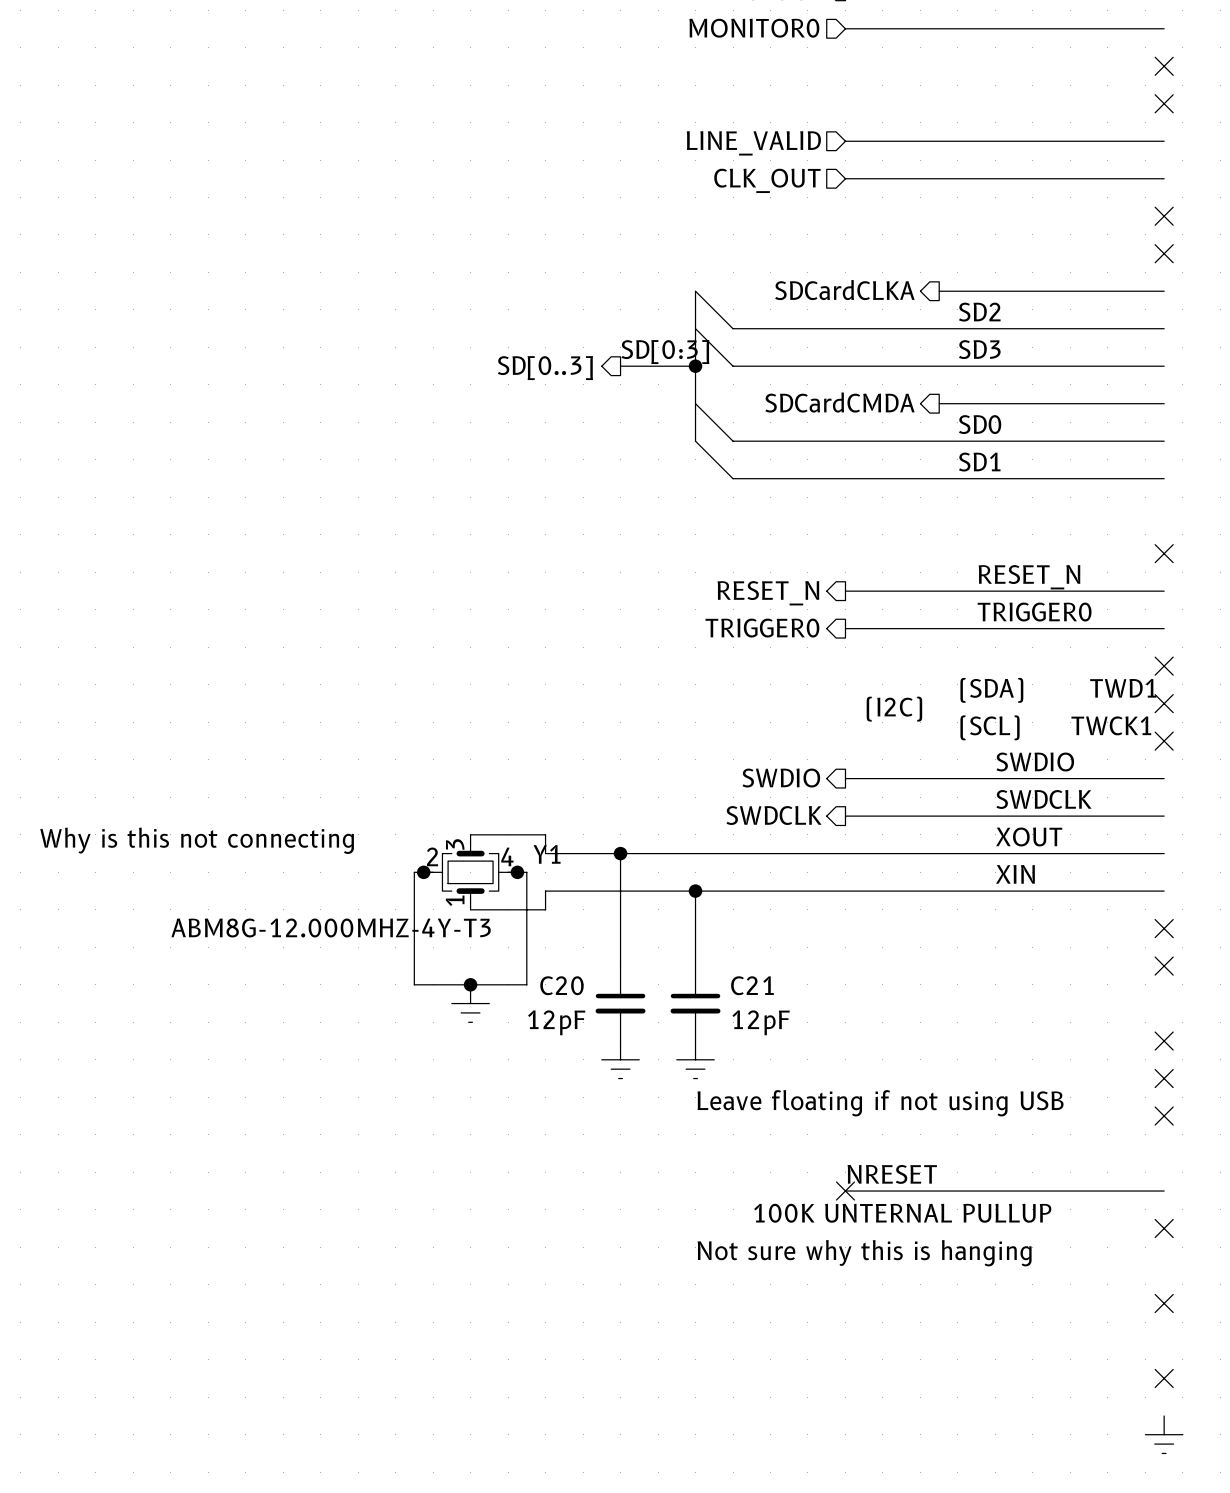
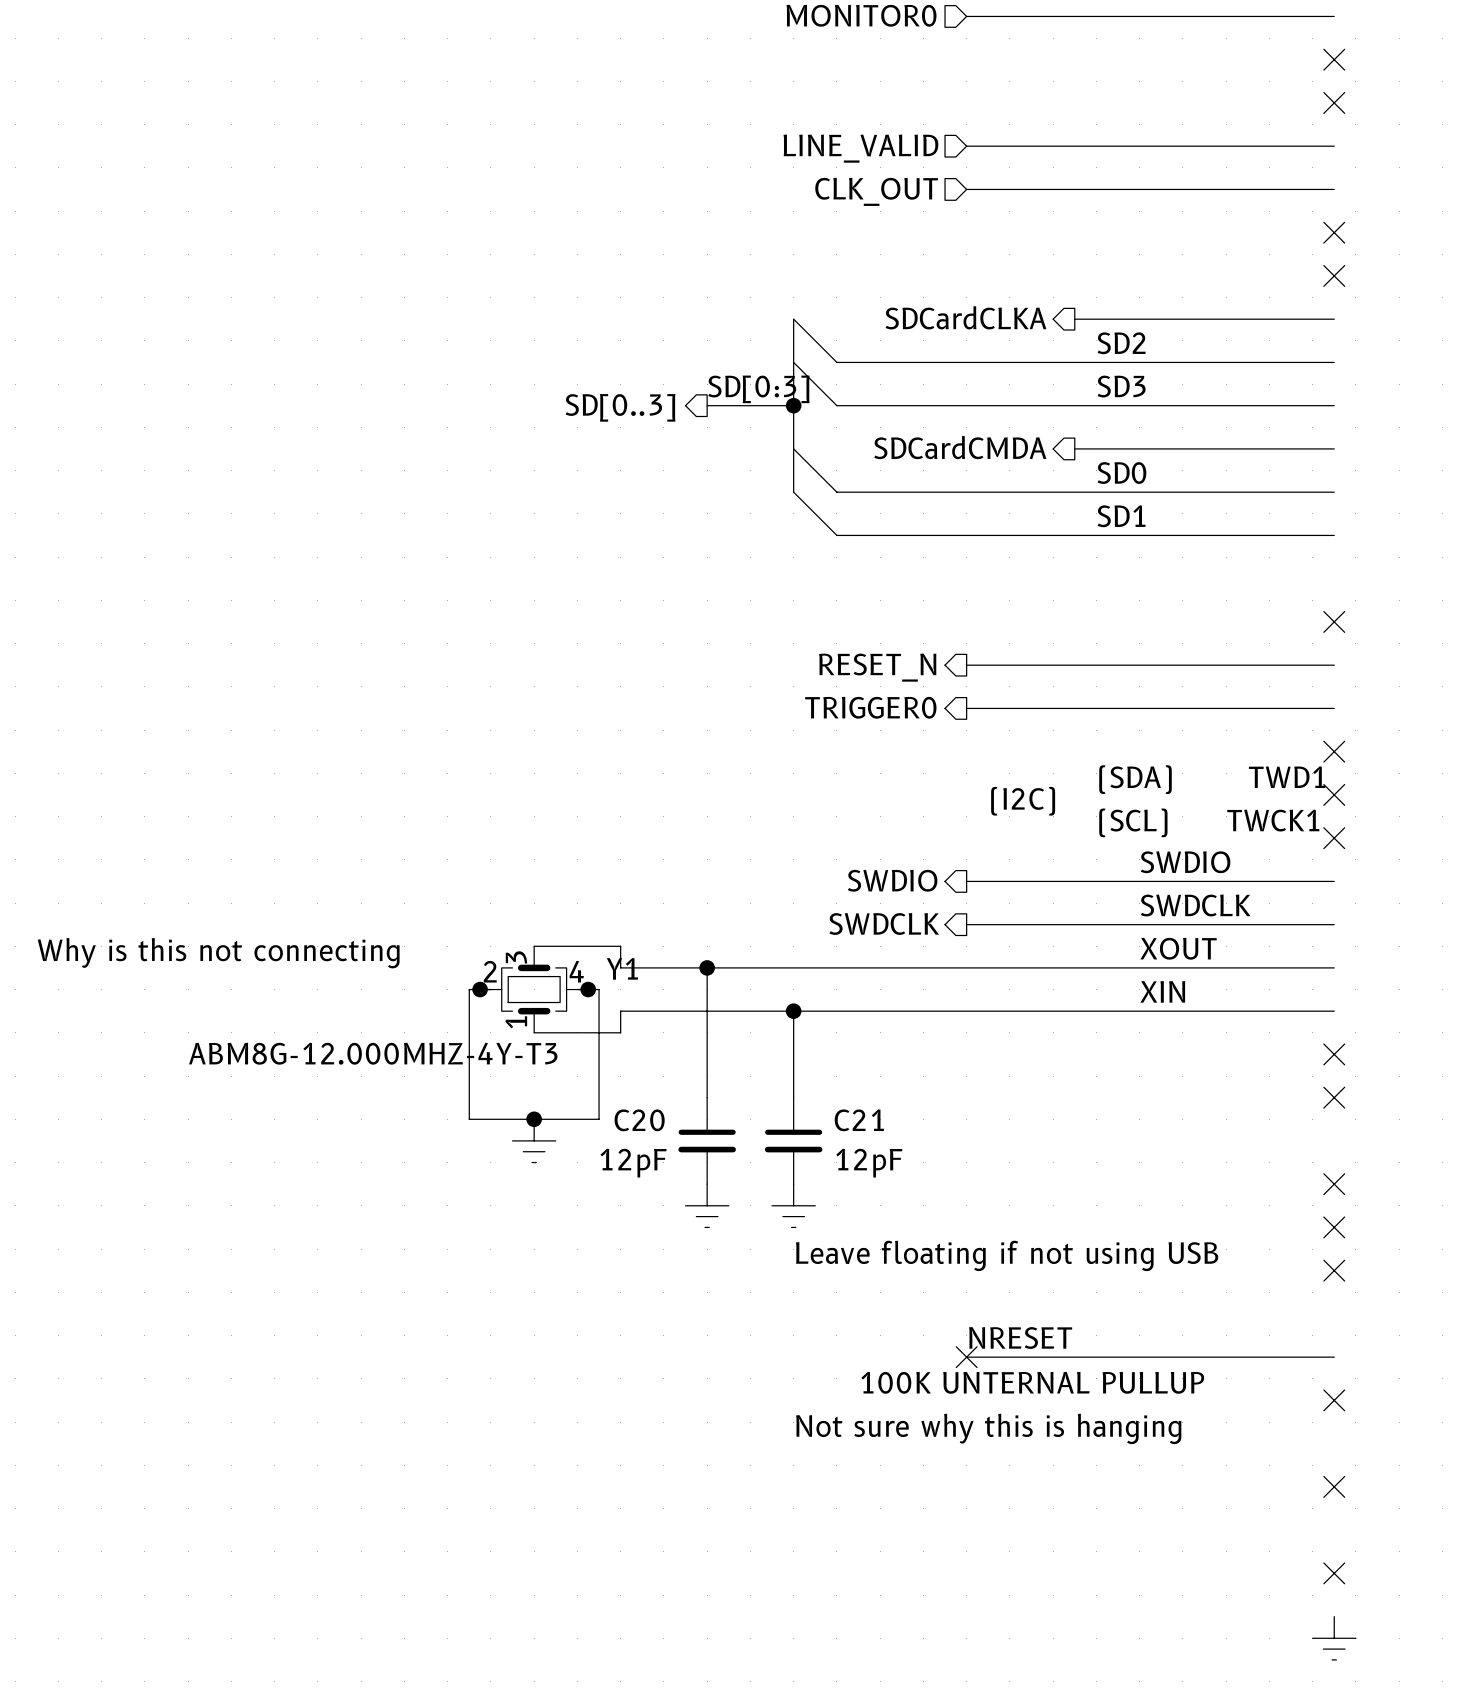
label: RESET_N (1029, 577) -> none
label: TRIGGER0 (1034, 612) -> none

